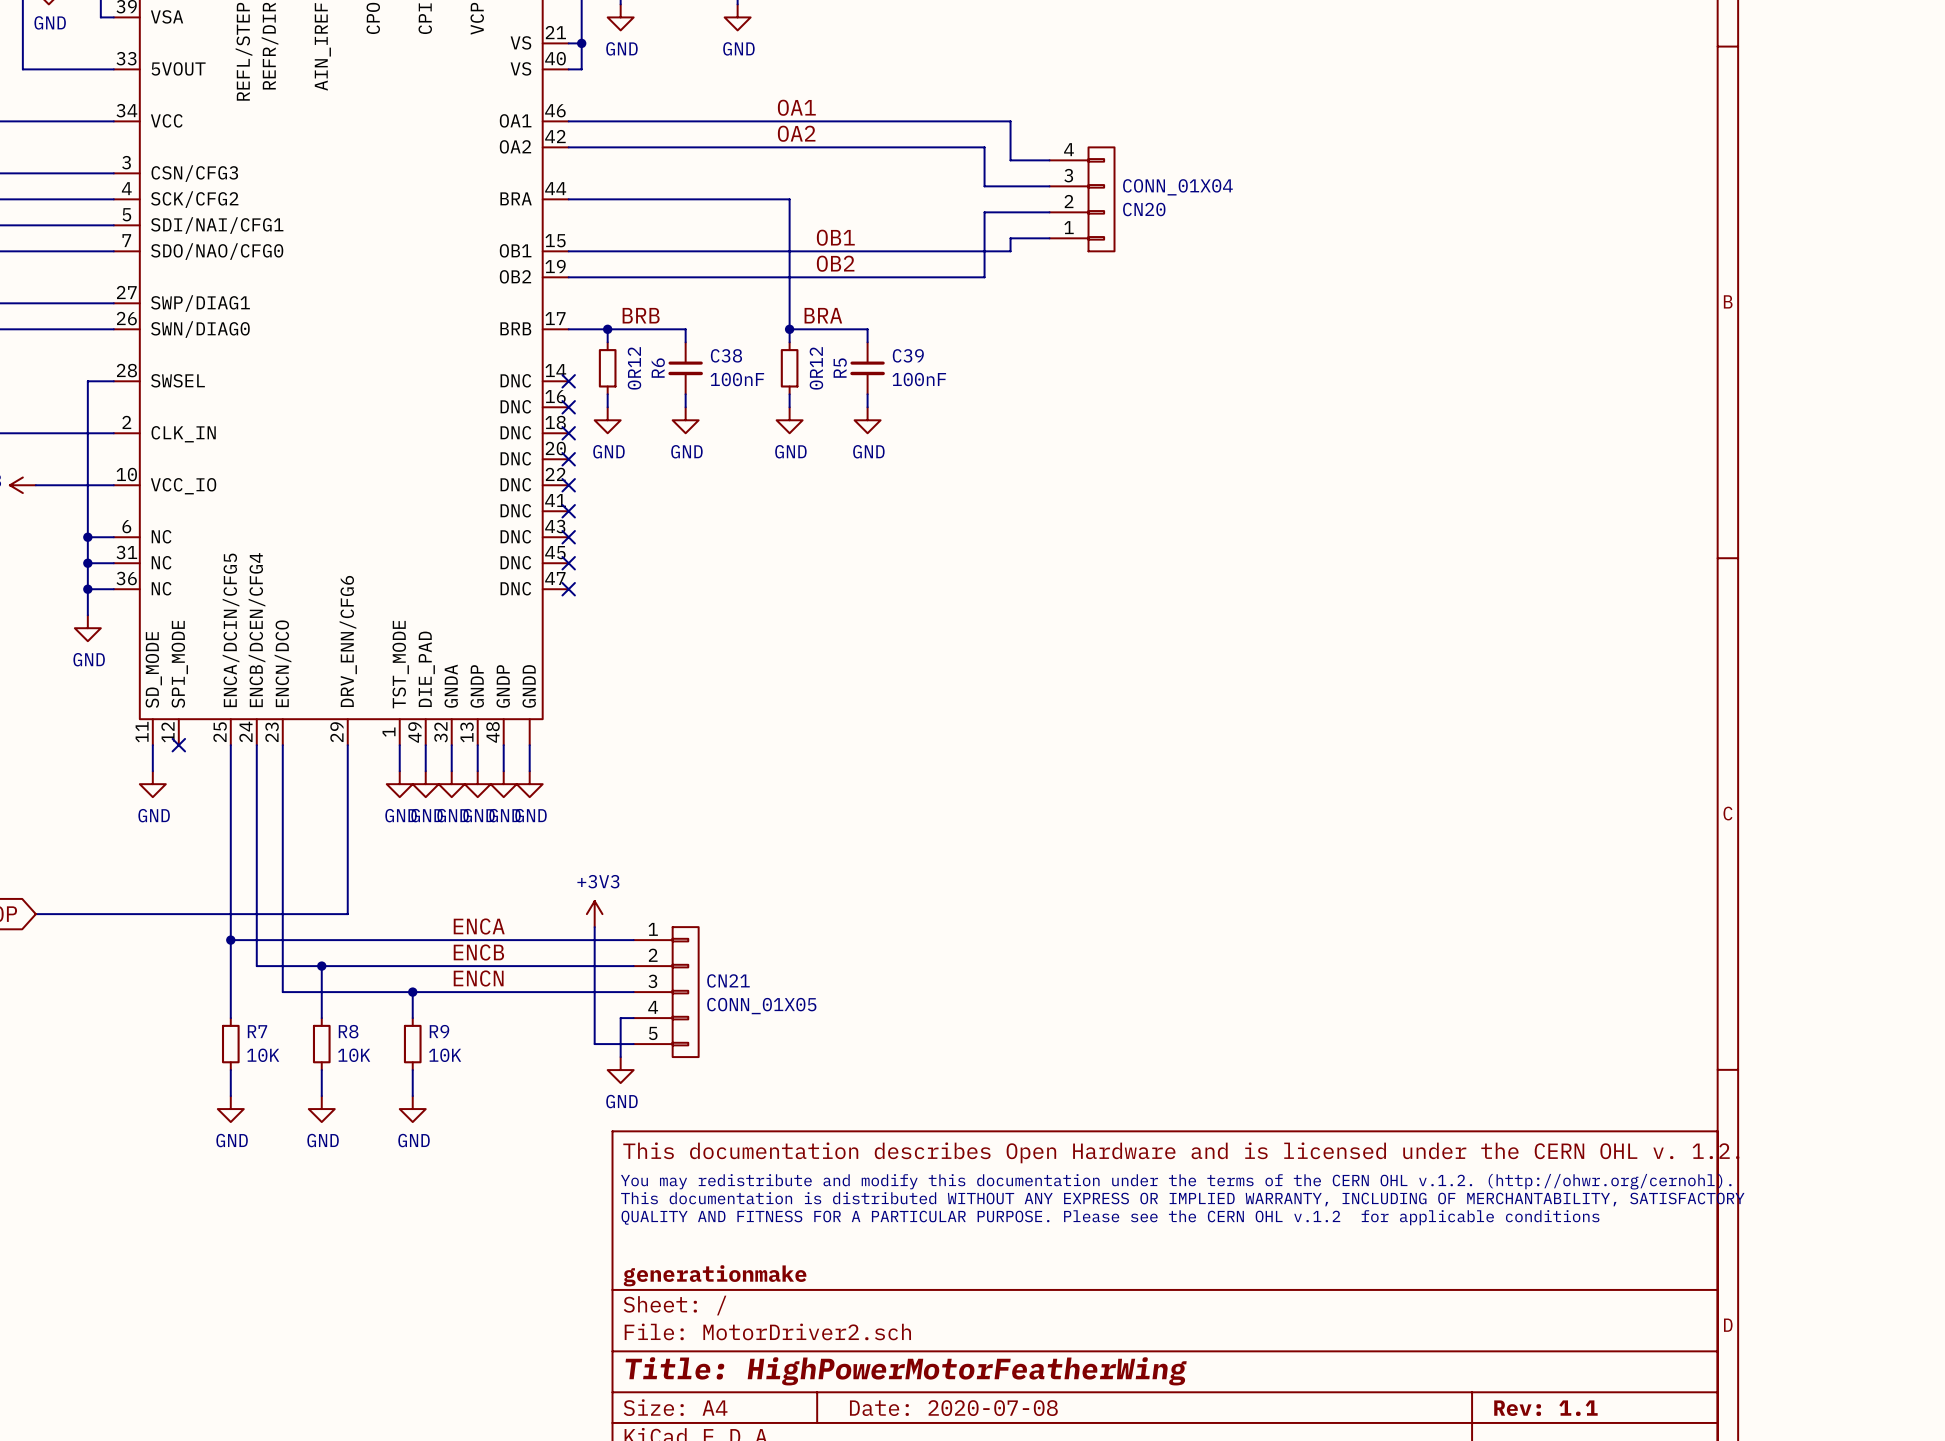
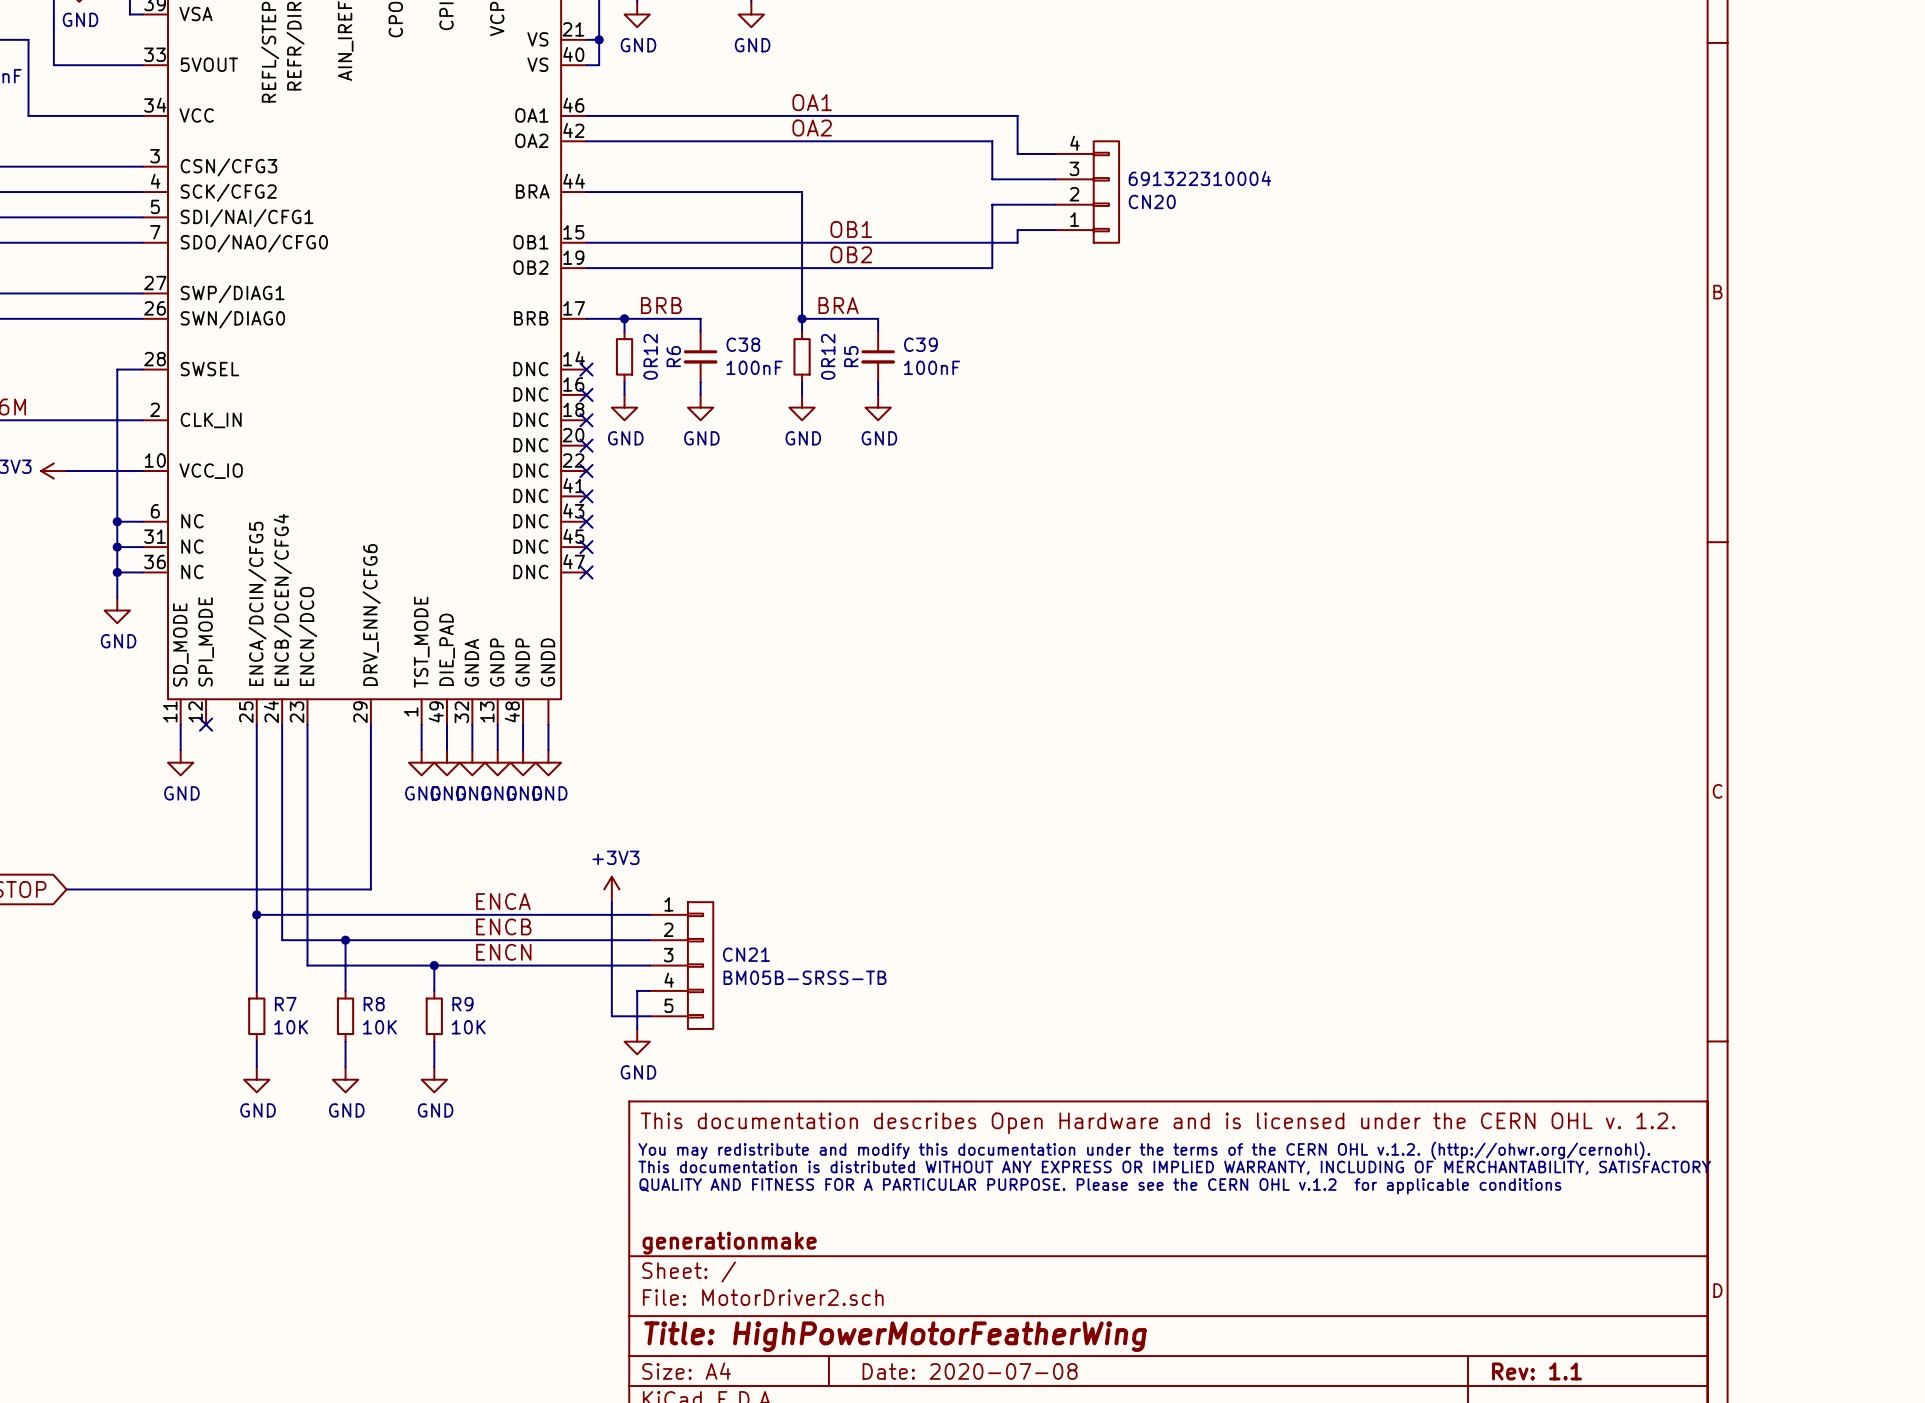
CN20 value: CONN_01X04 (1177, 187) -> 691322310004 (1199, 178)
CN21 value: CONN_01X05 (761, 1006) -> BM05B-SRSS-TB (805, 977)

